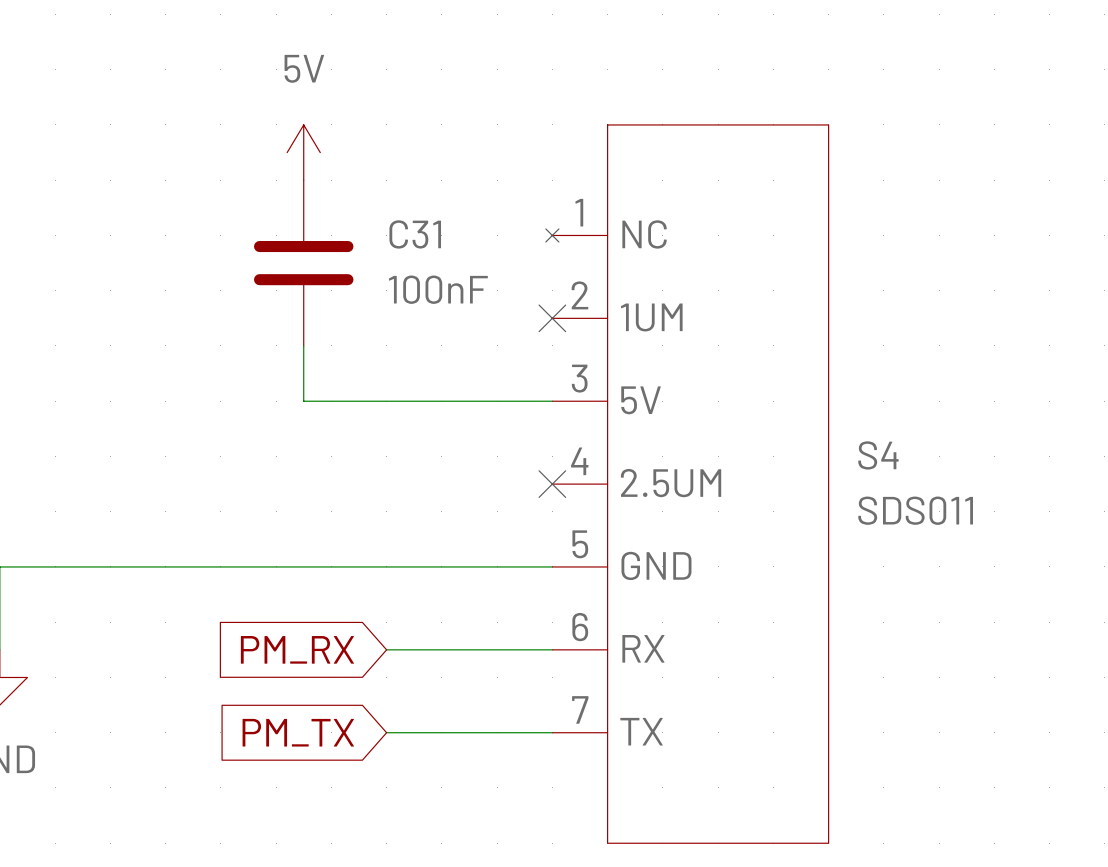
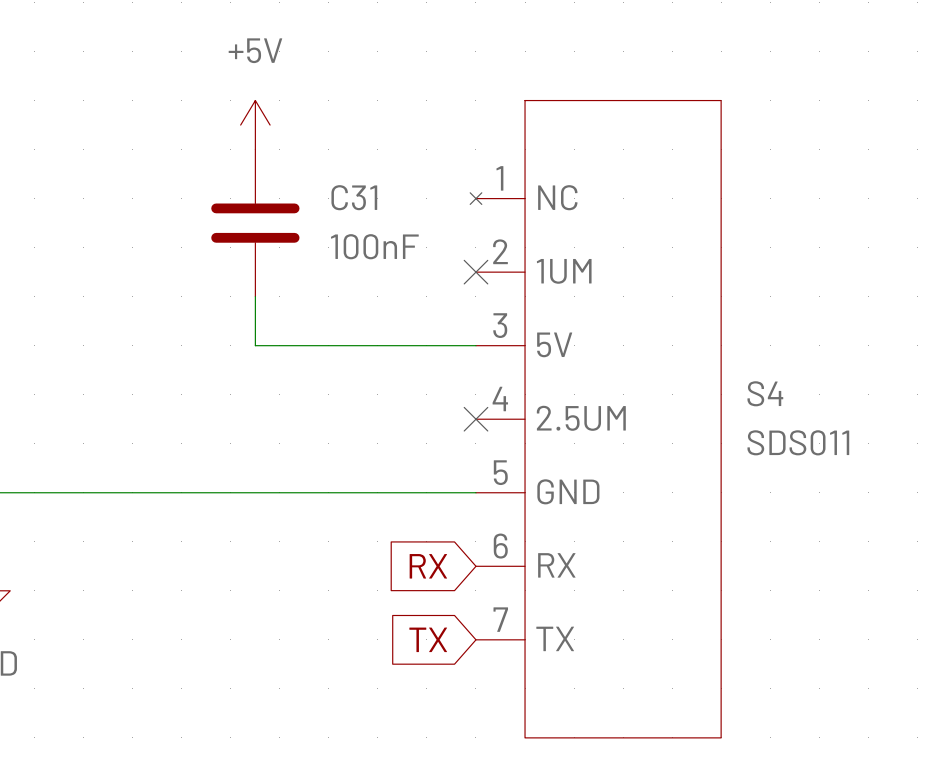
power symbol: 5V (303, 152) -> +5V (255, 125)
global label: PM_RX (297, 649) -> none
wire: (386, 649) (552, 649) -> none
global label: none -> RX (428, 566)
global label: PM_TX (298, 732) -> none
wire: (386, 732) (552, 732) -> none
global label: none -> TX (428, 639)

